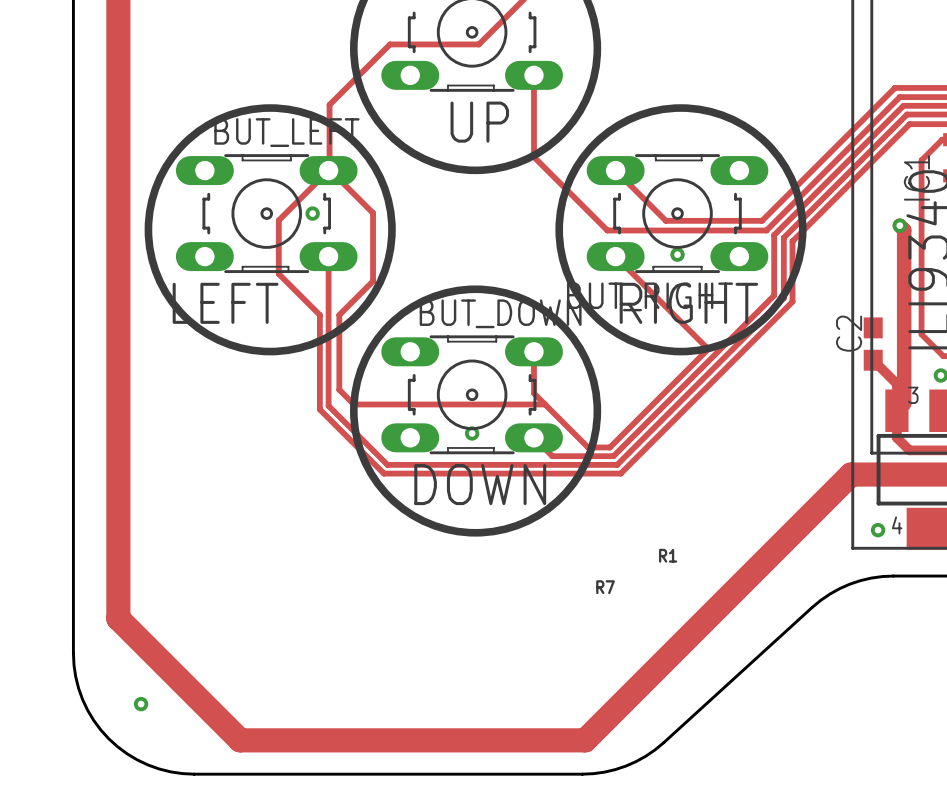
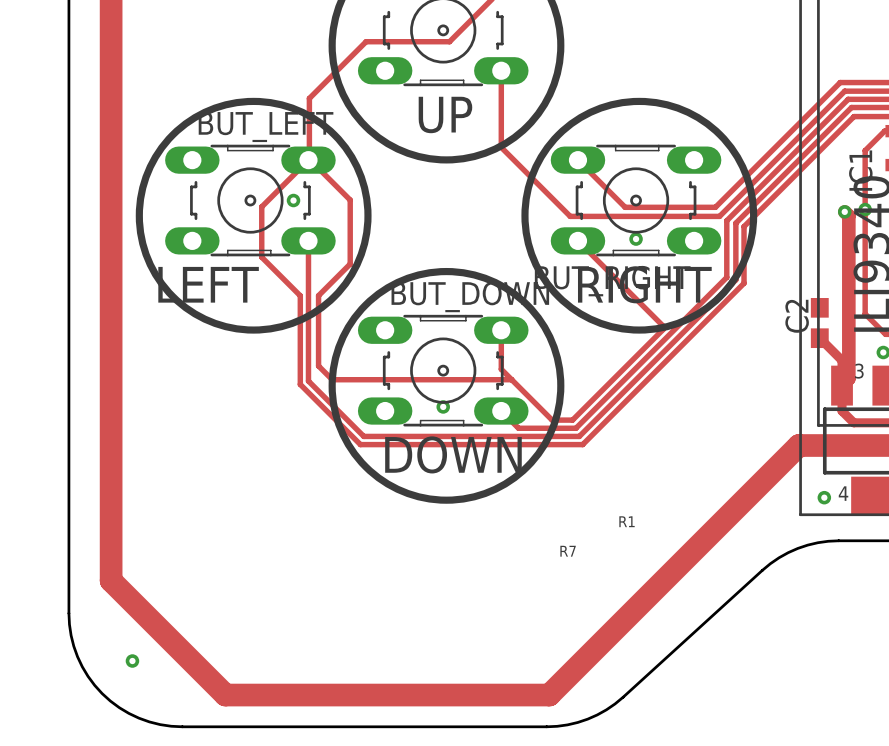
via: none -> (865, 209)

